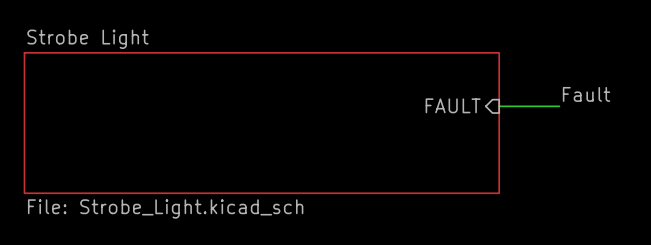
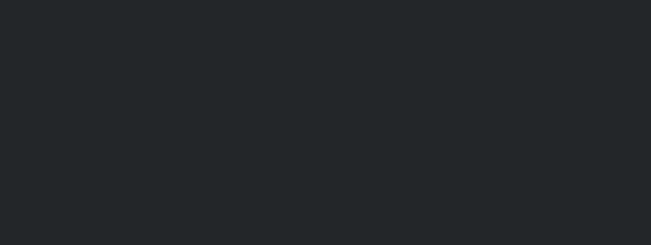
label: Fault (586, 94) -> none
sheet pin: FAULT (453, 105) -> none
wire: (499, 106) (559, 106) -> none
sheet Strobe Light: File: Strobe_Light.kicad_sch (261, 123) -> none

